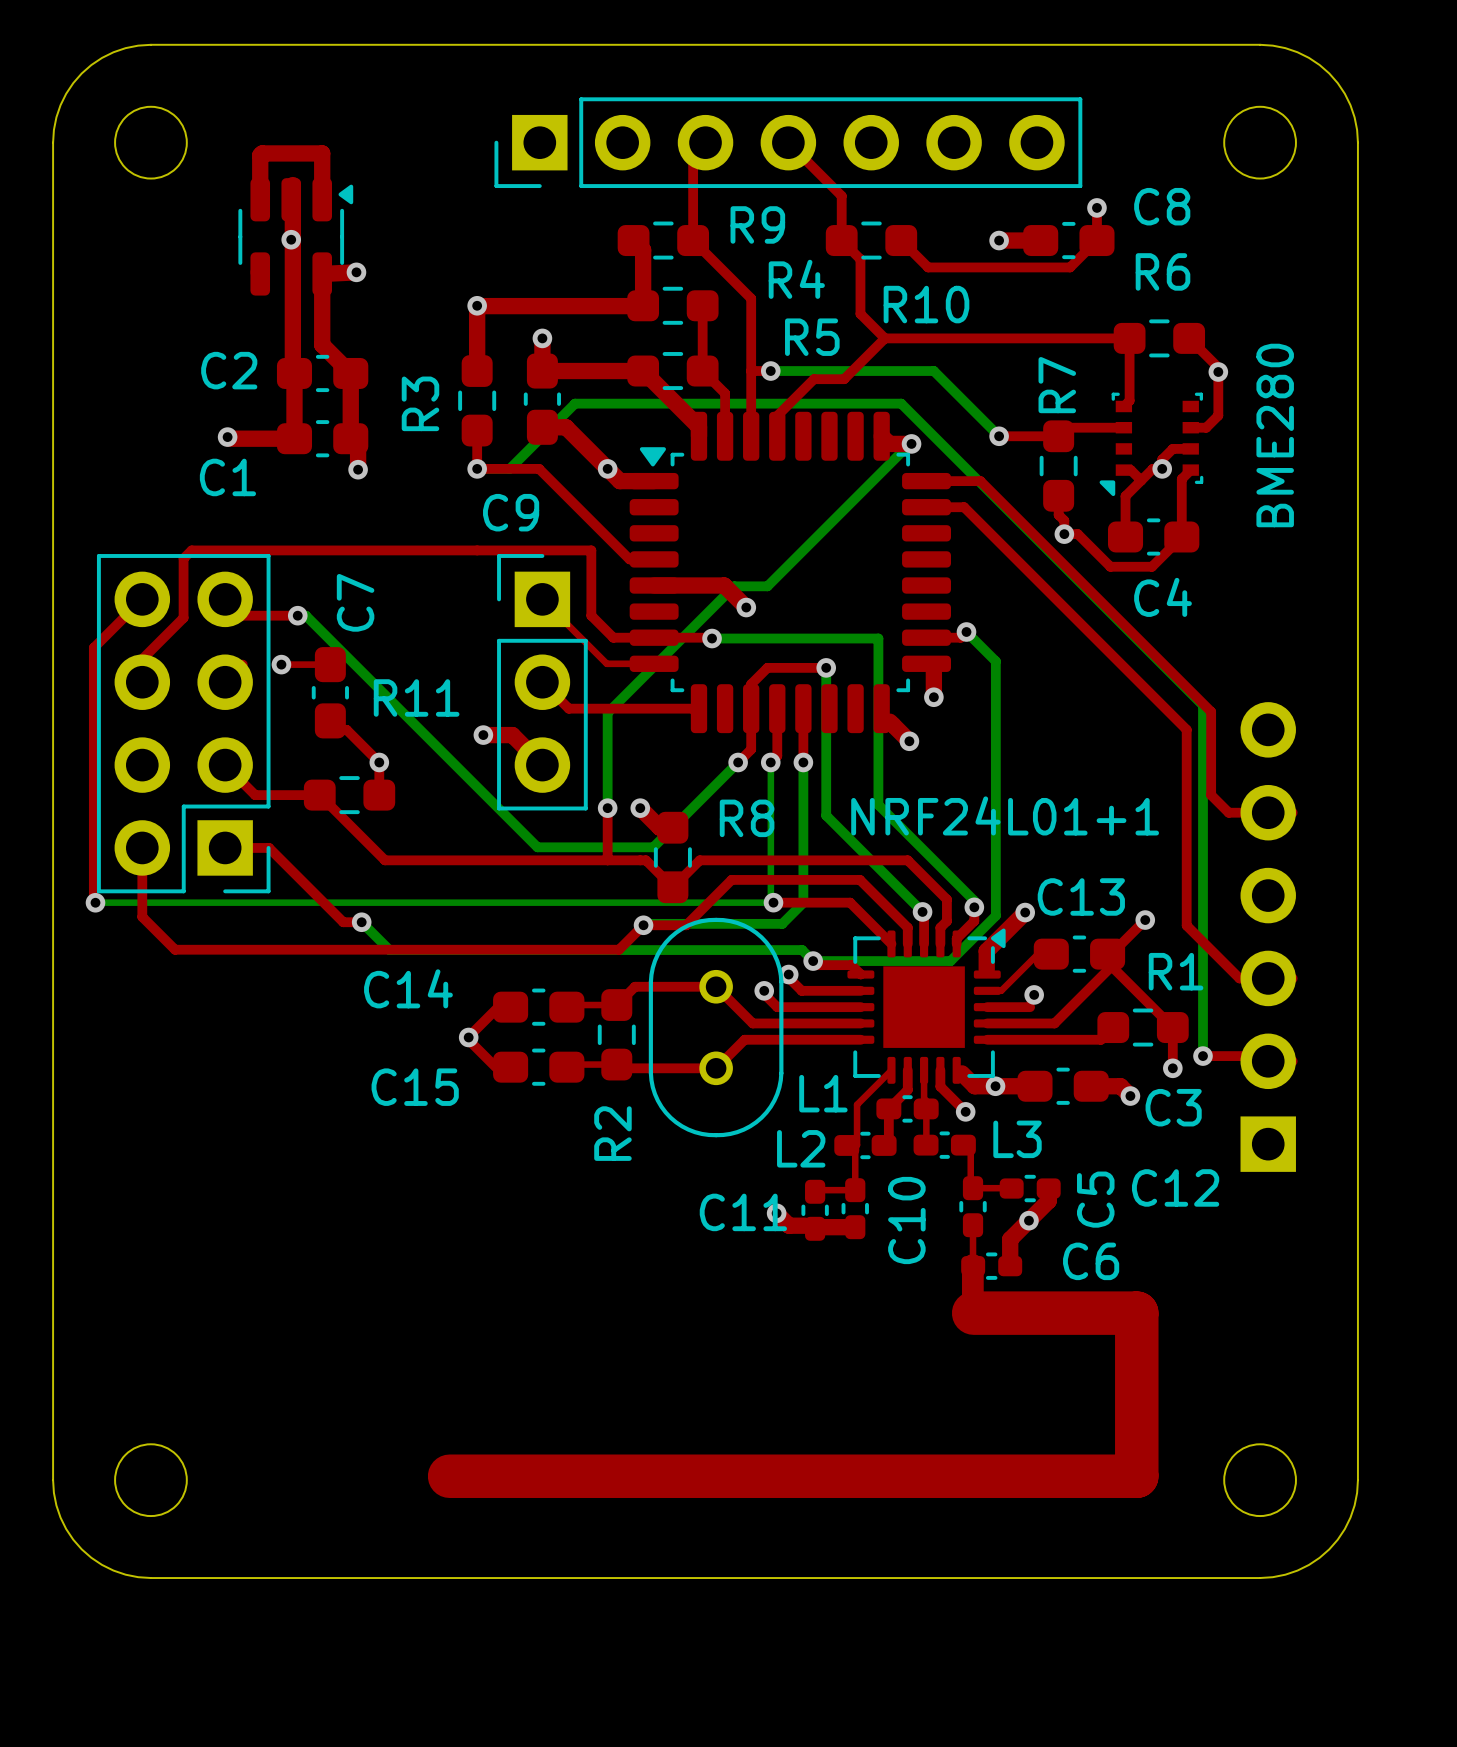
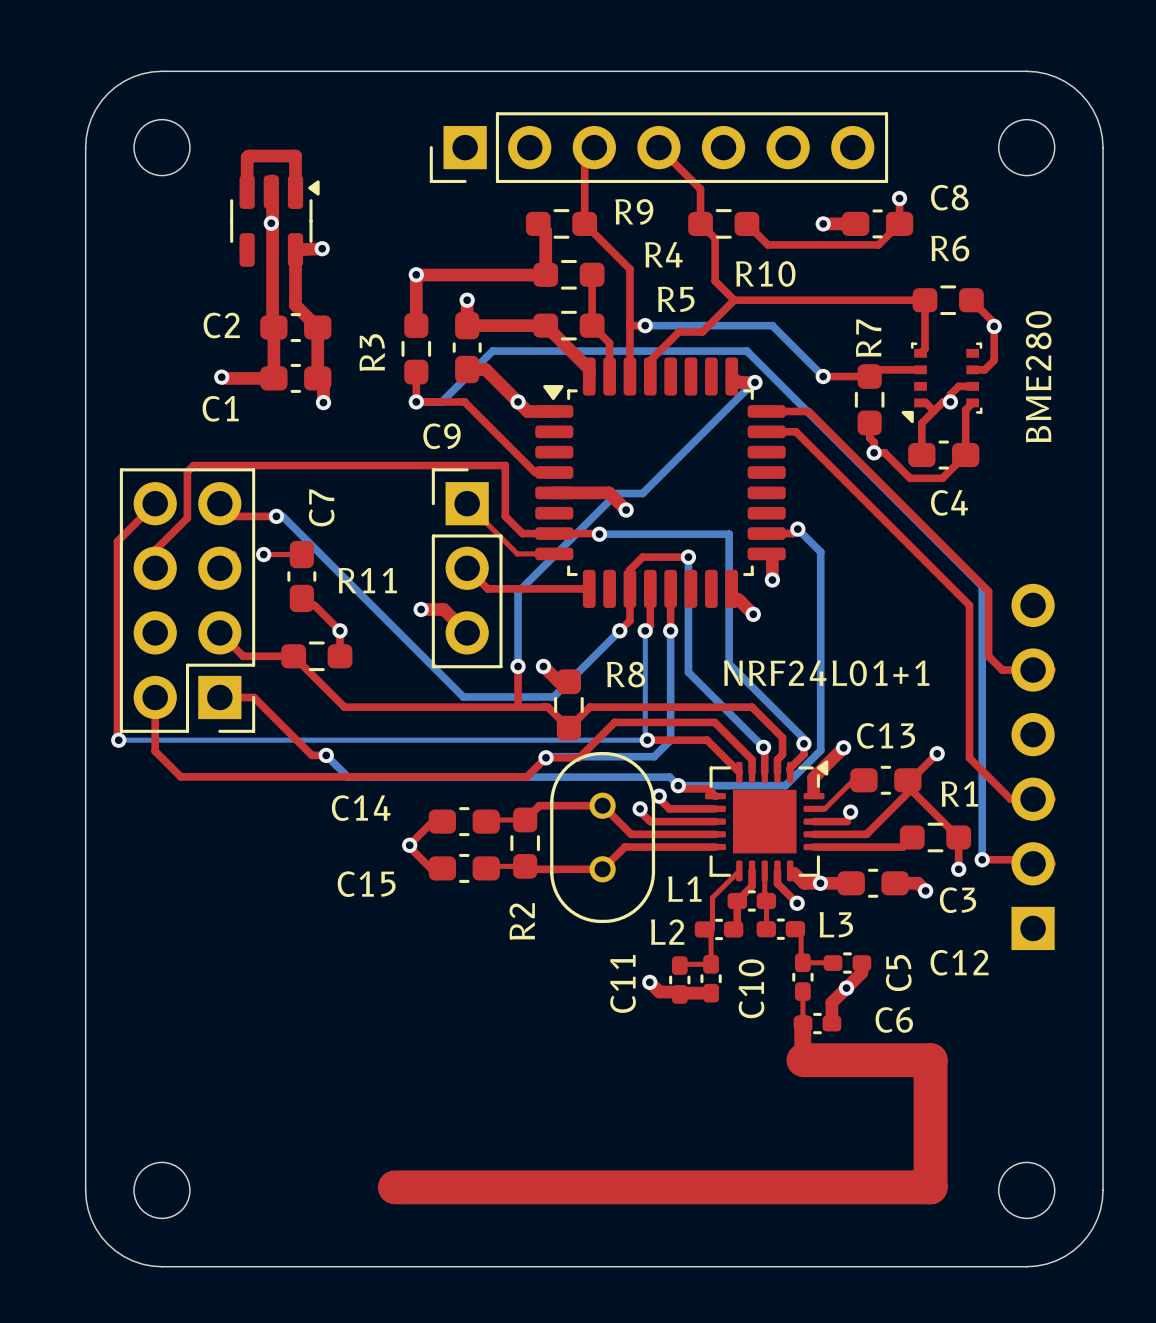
C11 name rotation: 0° (743, 1212) -> 90° counterclockwise (623, 983)

